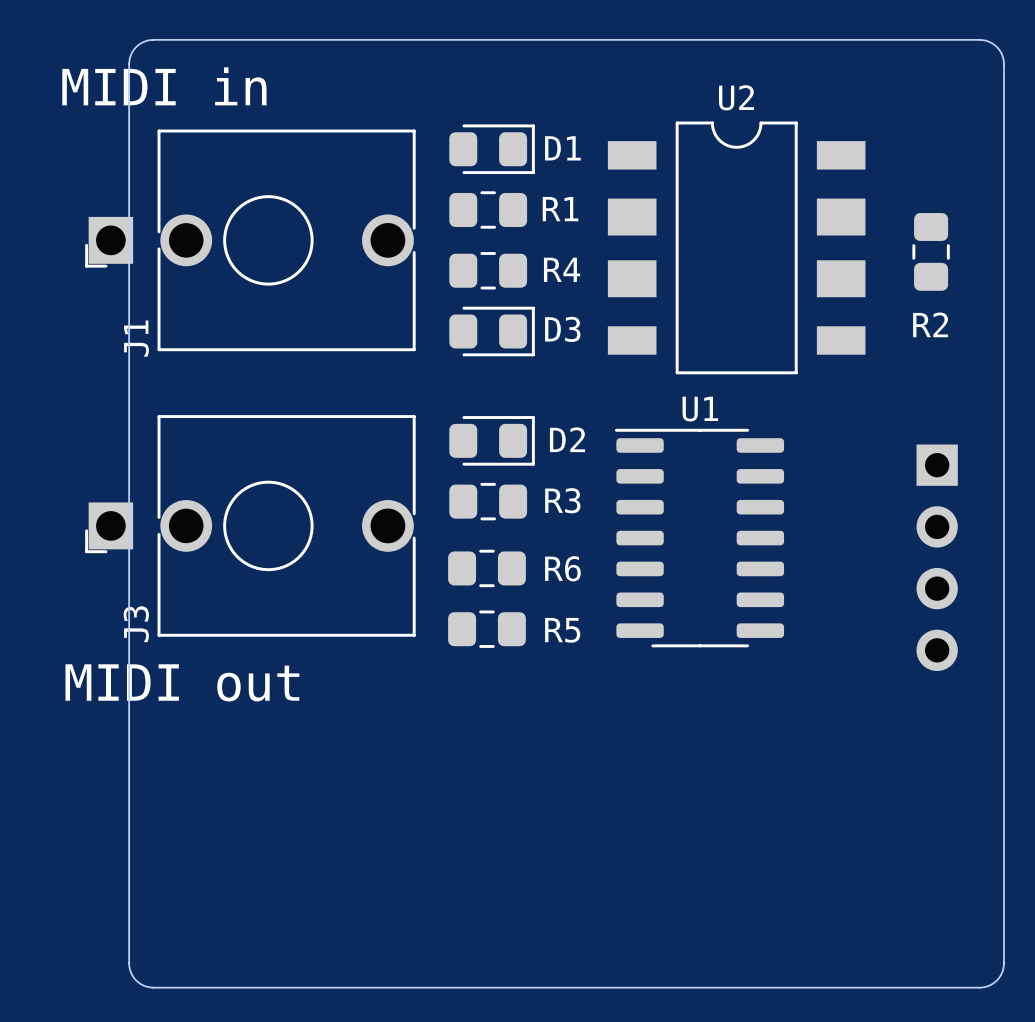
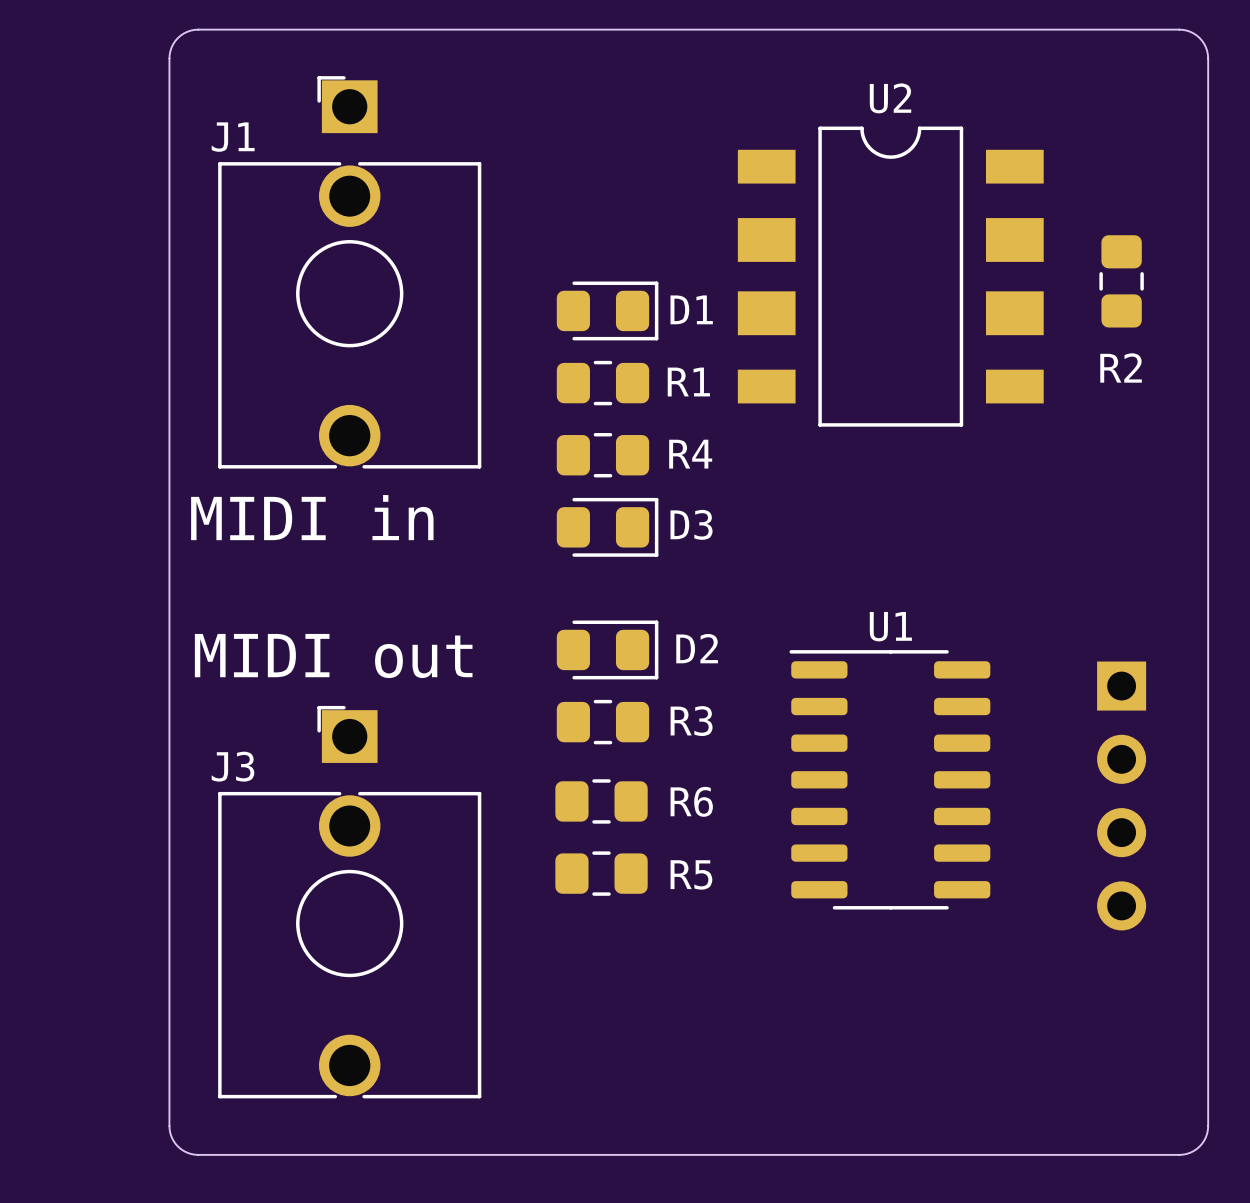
text position: MIDI in (164, 86) -> MIDI in (312, 517)
D1 position: (492, 149) -> (607, 310)
R1 position: (488, 210) -> (602, 383)
J1 rotation: 0° (250, 240) -> 90° clockwise (349, 272)
R4 position: (488, 270) -> (602, 455)
D3 position: (492, 331) -> (607, 527)
D2 position: (492, 440) -> (607, 649)
R3 position: (488, 501) -> (602, 722)
J3 rotation: 0° (250, 525) -> 90° clockwise (349, 902)
J3 position: (250, 525) -> (349, 902)
U1 position: (699, 538) -> (889, 779)
part position: (937, 557) -> (1121, 795)
R6 position: (486, 568) -> (601, 801)
R5 position: (486, 629) -> (601, 873)
text position: MIDI out (182, 682) -> MIDI out (333, 655)

